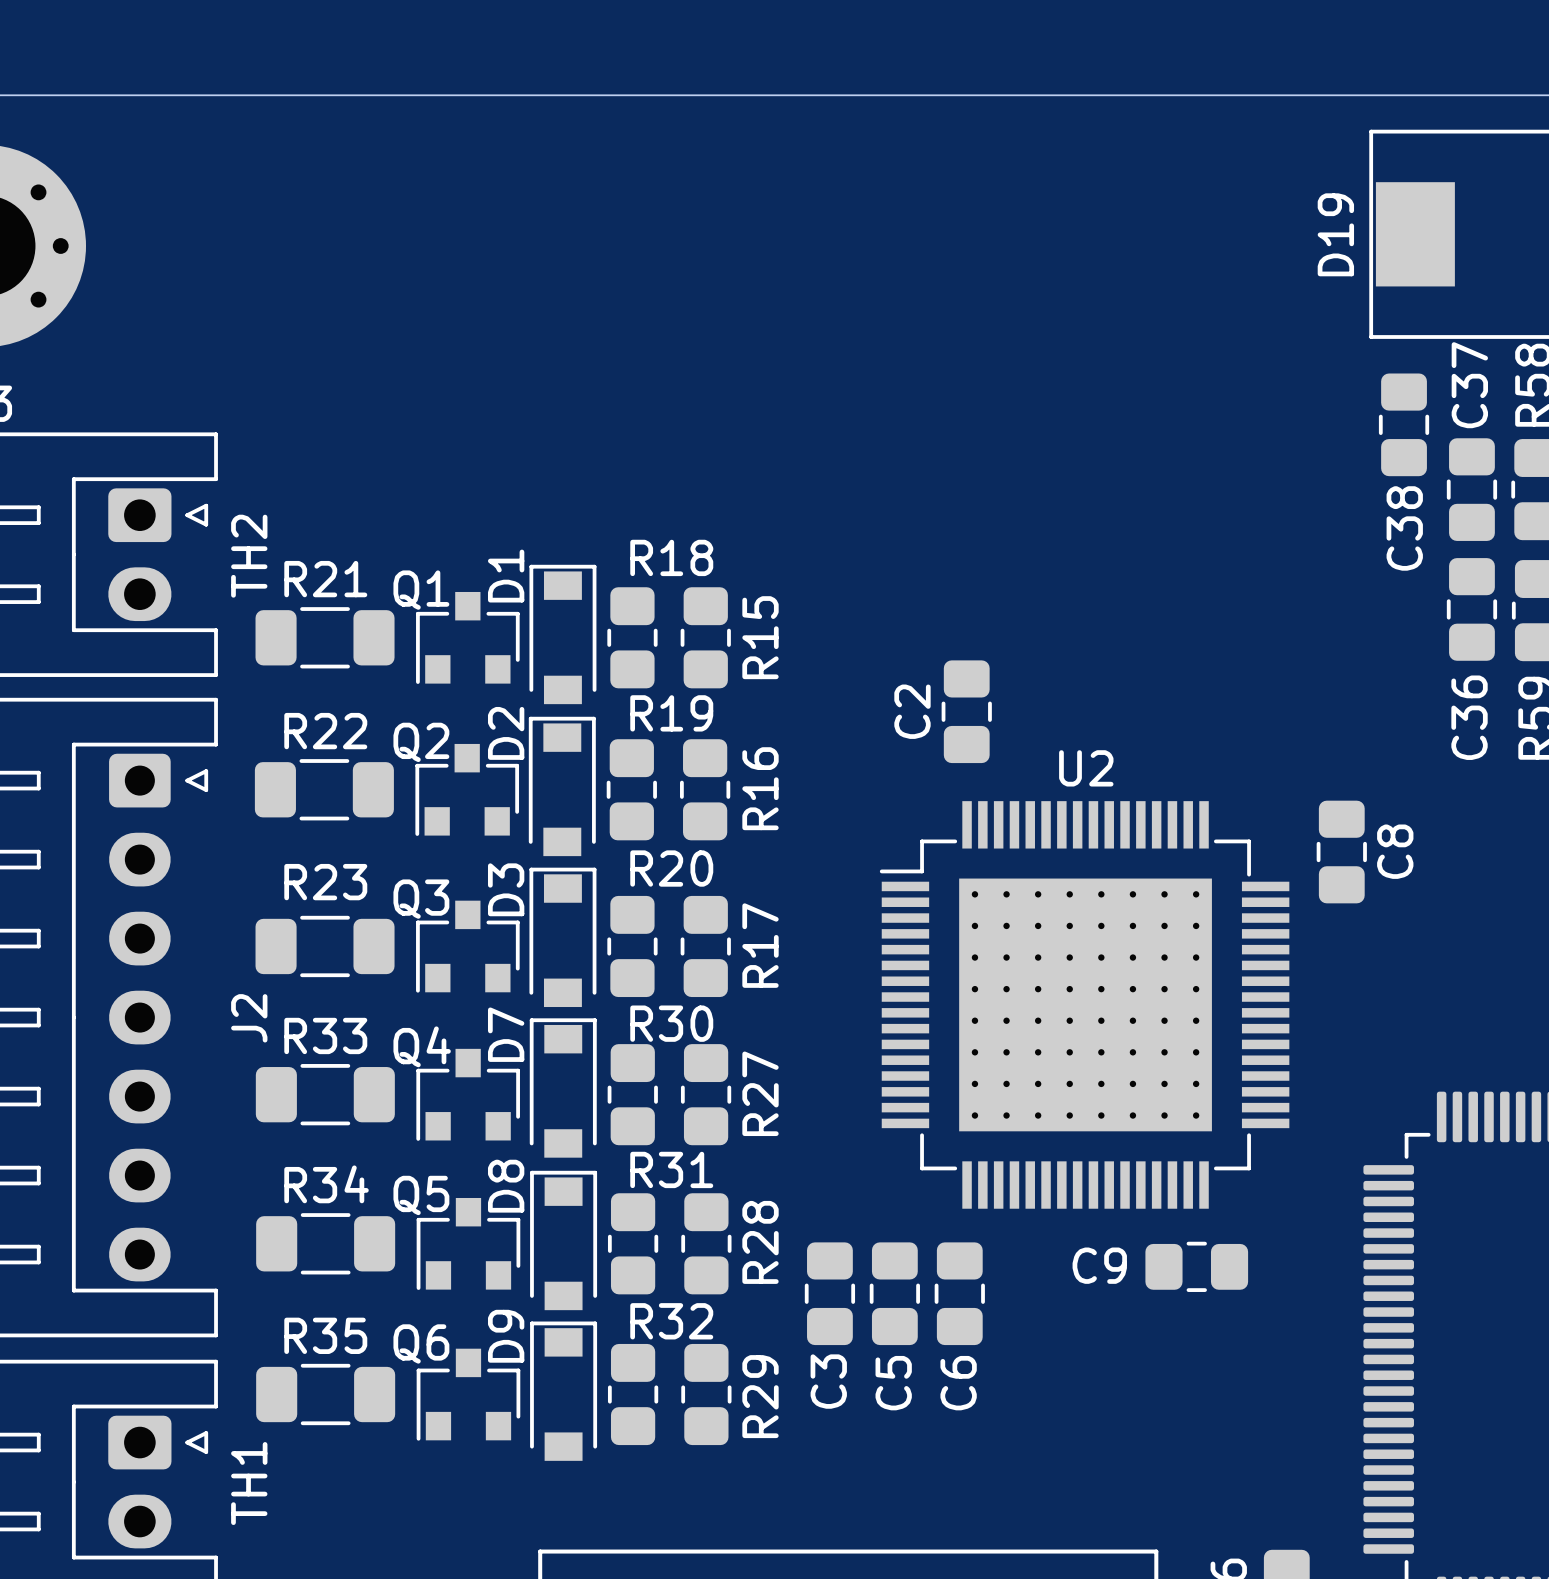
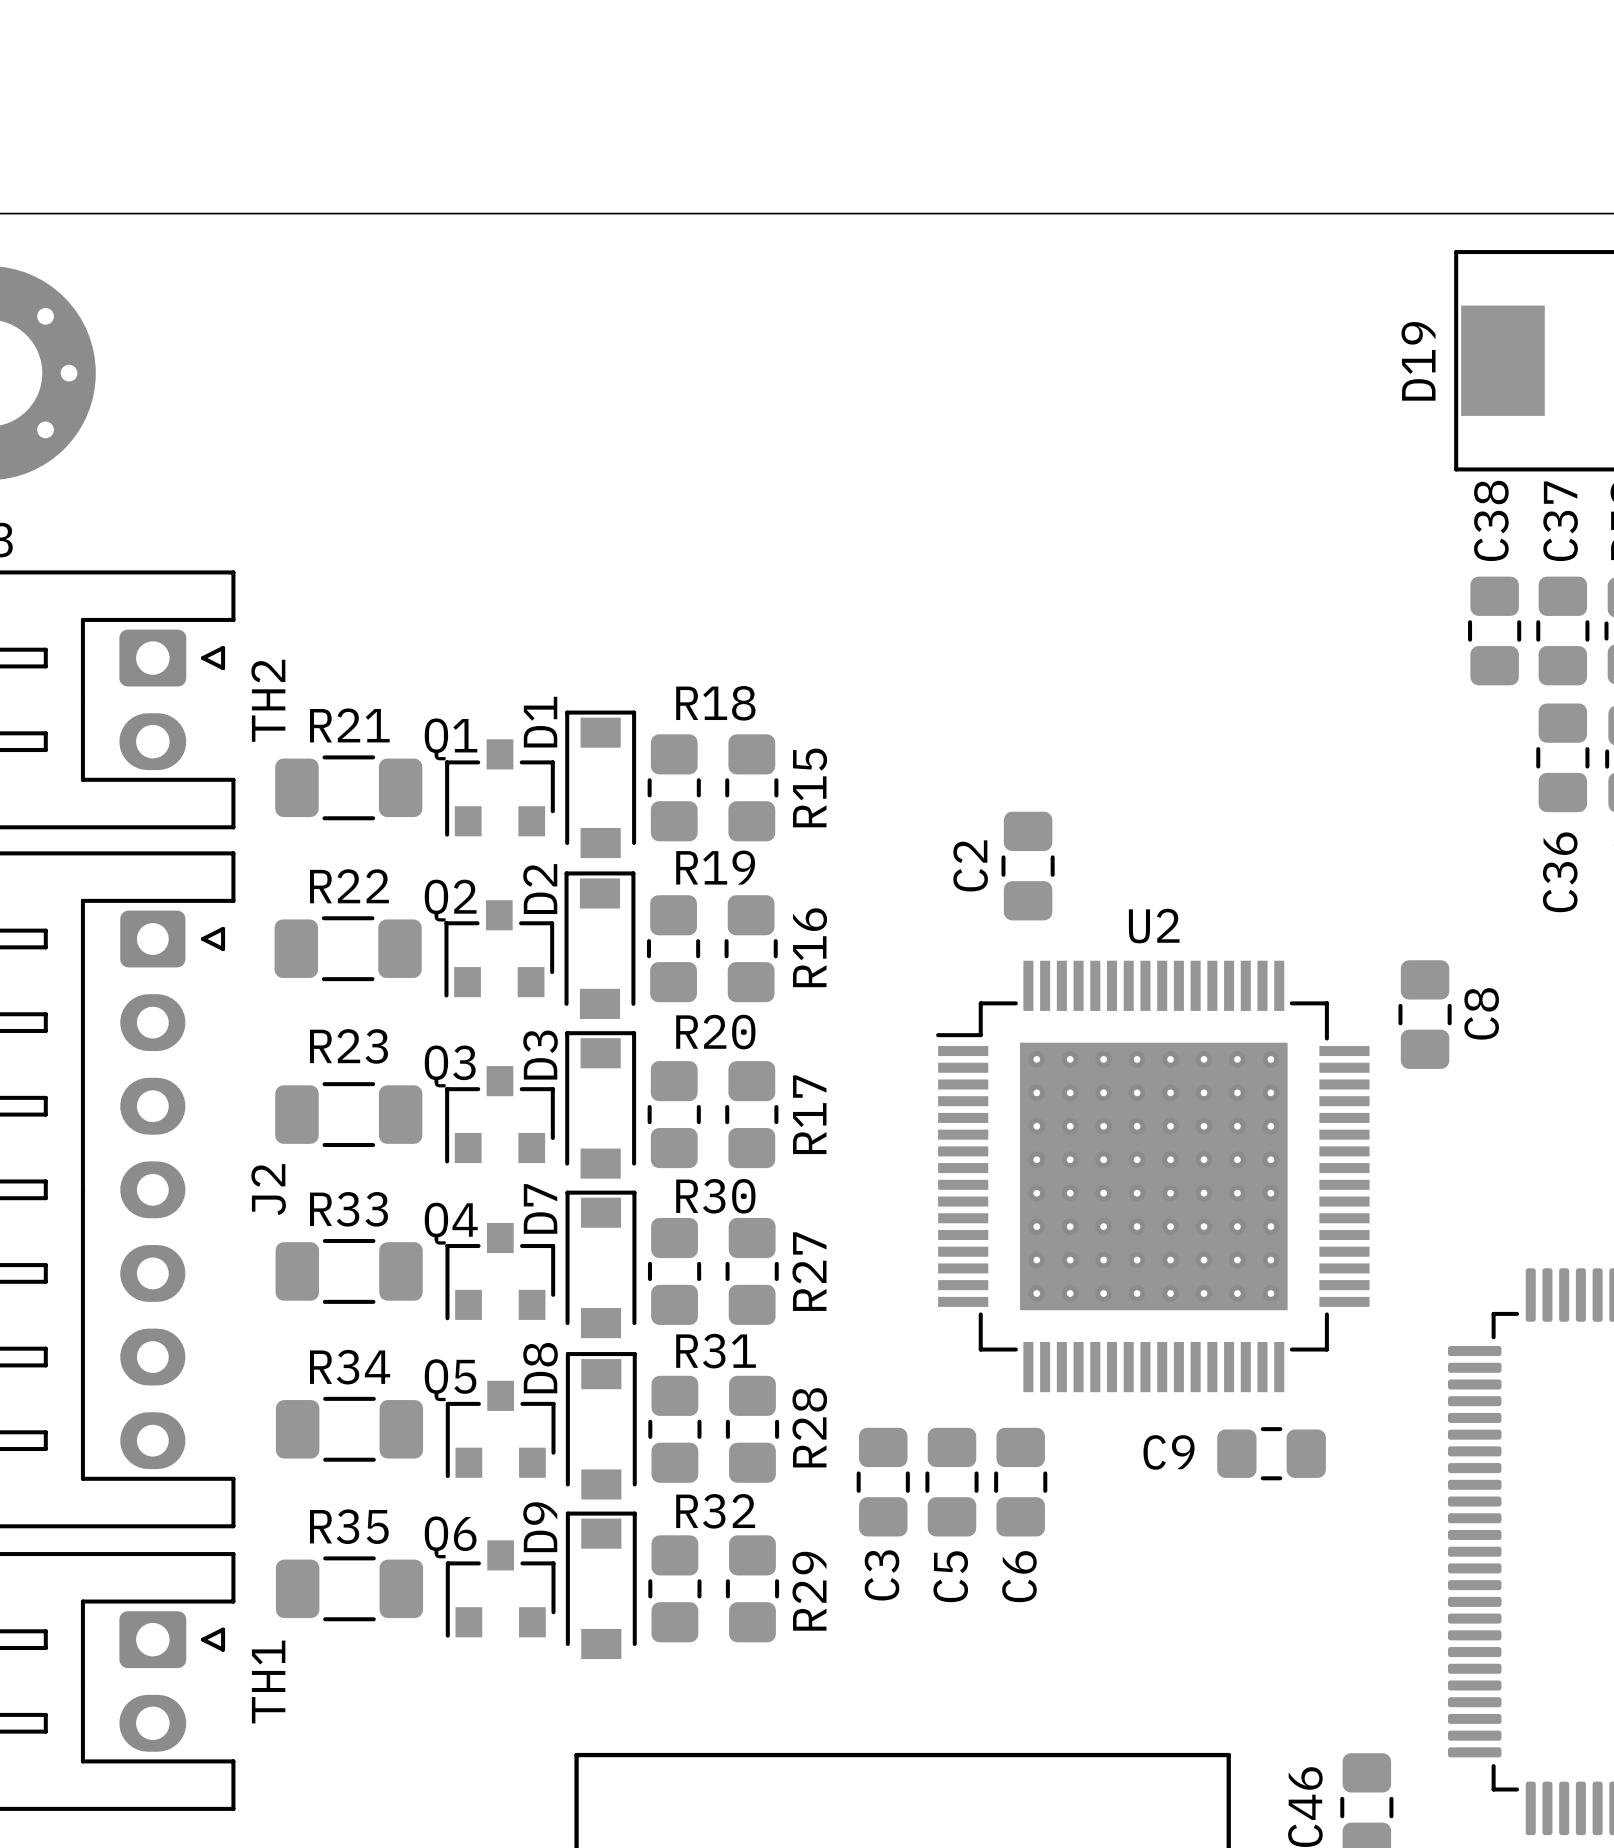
C38 position: (1404, 424) -> (1494, 630)
C38 name position: C38 (1404, 528) -> C38 (1491, 520)

